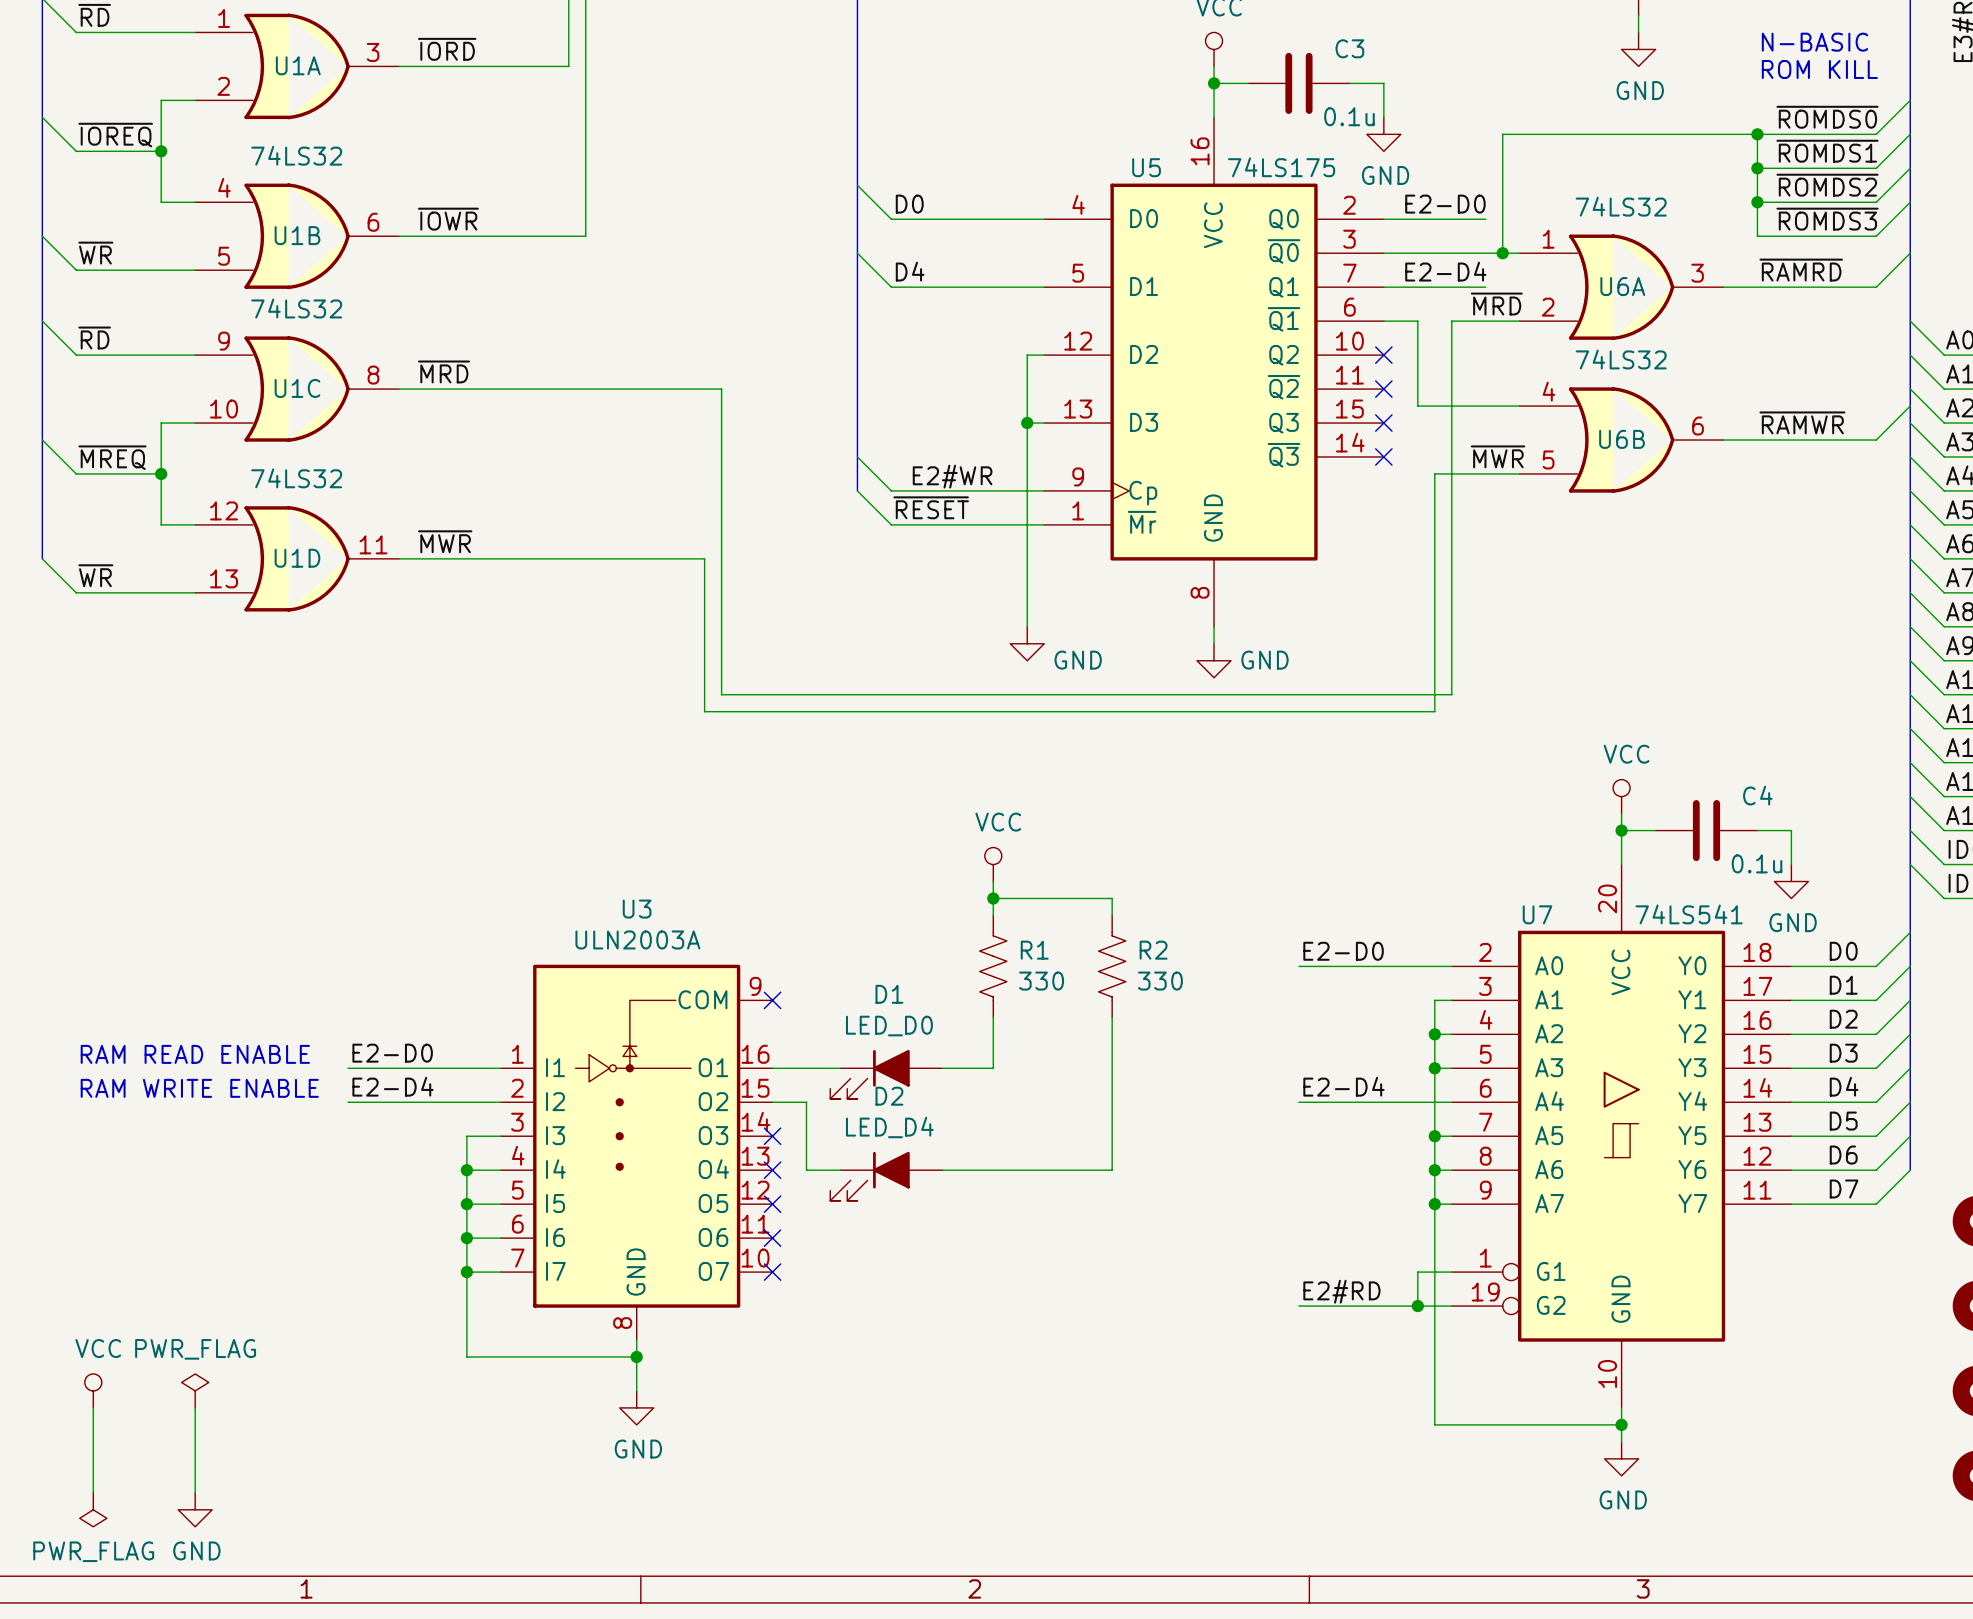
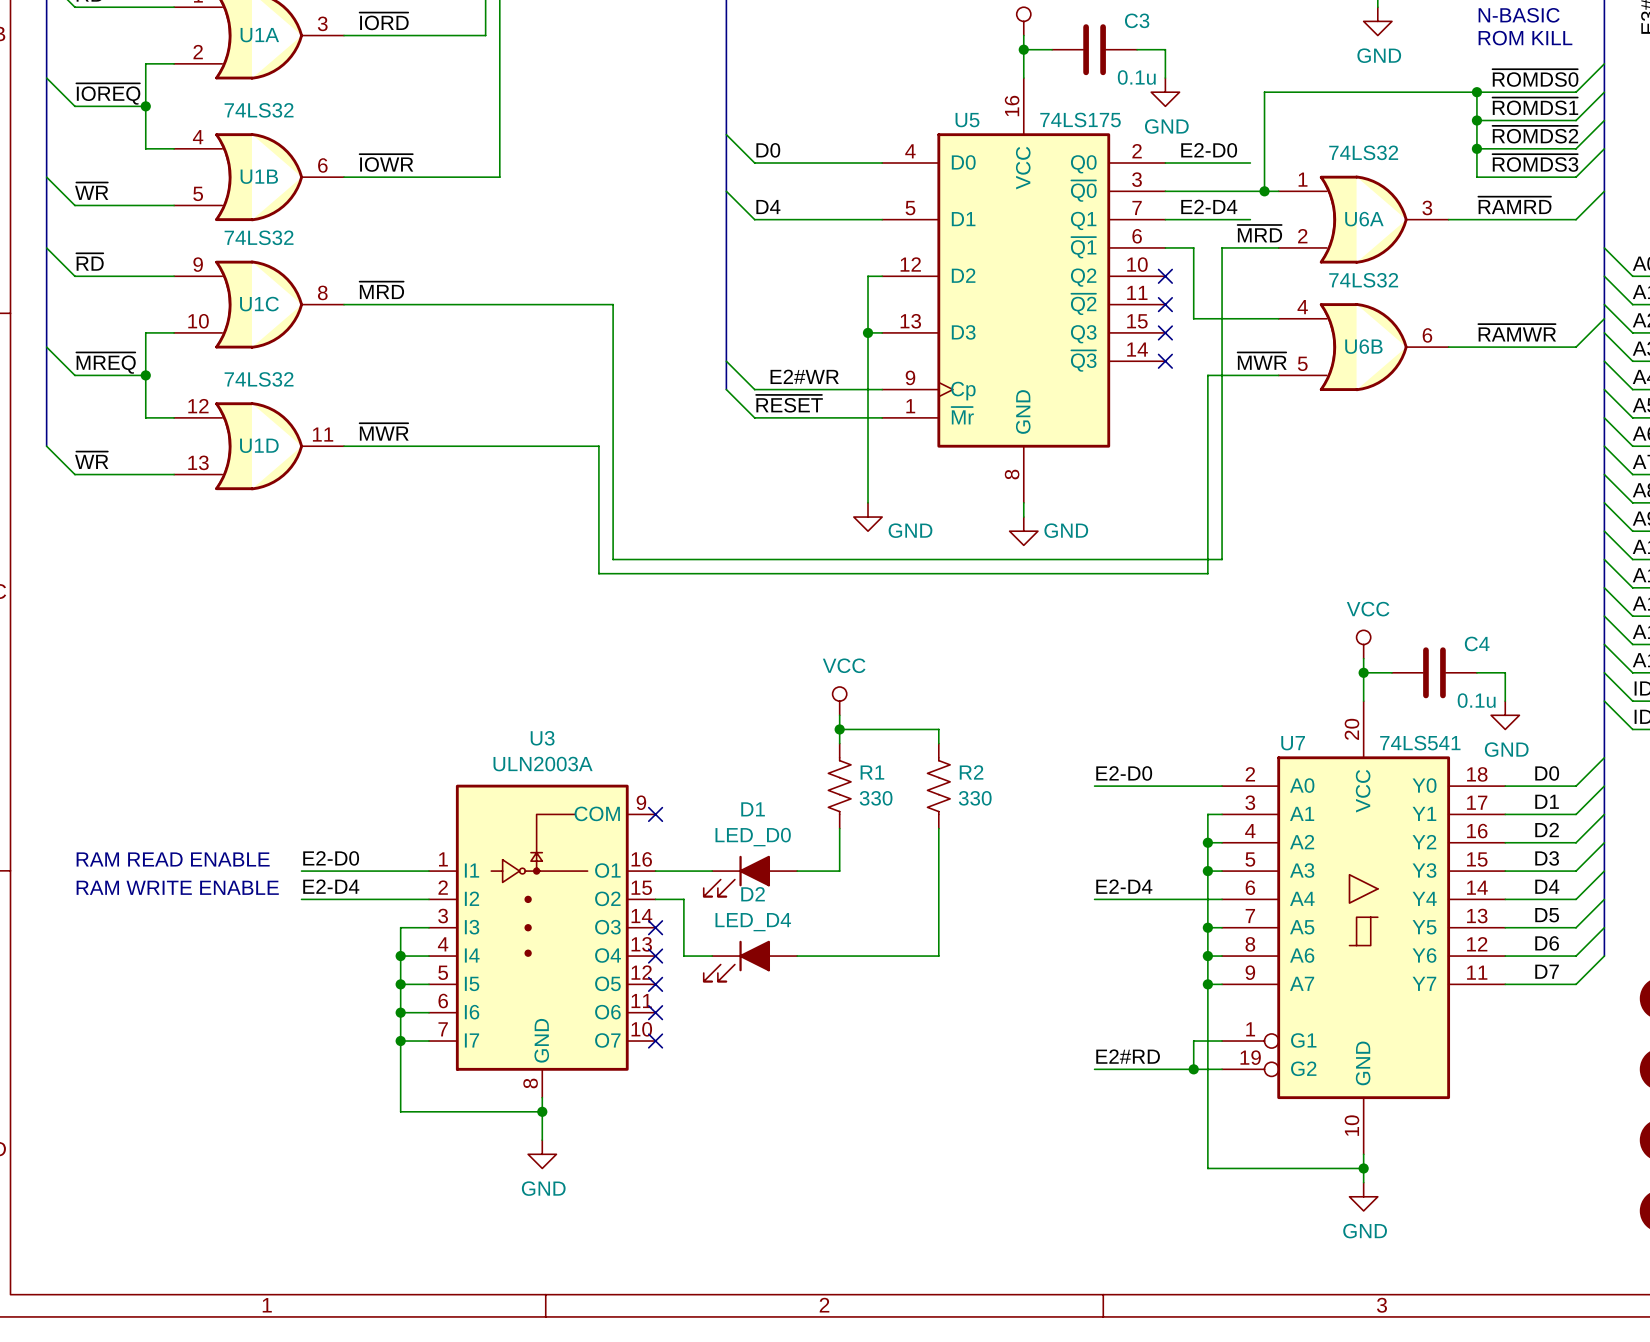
power symbol: VCC (93, 1390) -> none
power symbol: PWR_FLAG (195, 1390) -> none
wire: (93, 1407) (93, 1492) -> none
wire: (195, 1407) (195, 1492) -> none
power symbol: PWR_FLAG (93, 1509) -> none
power symbol: GND (195, 1509) -> none

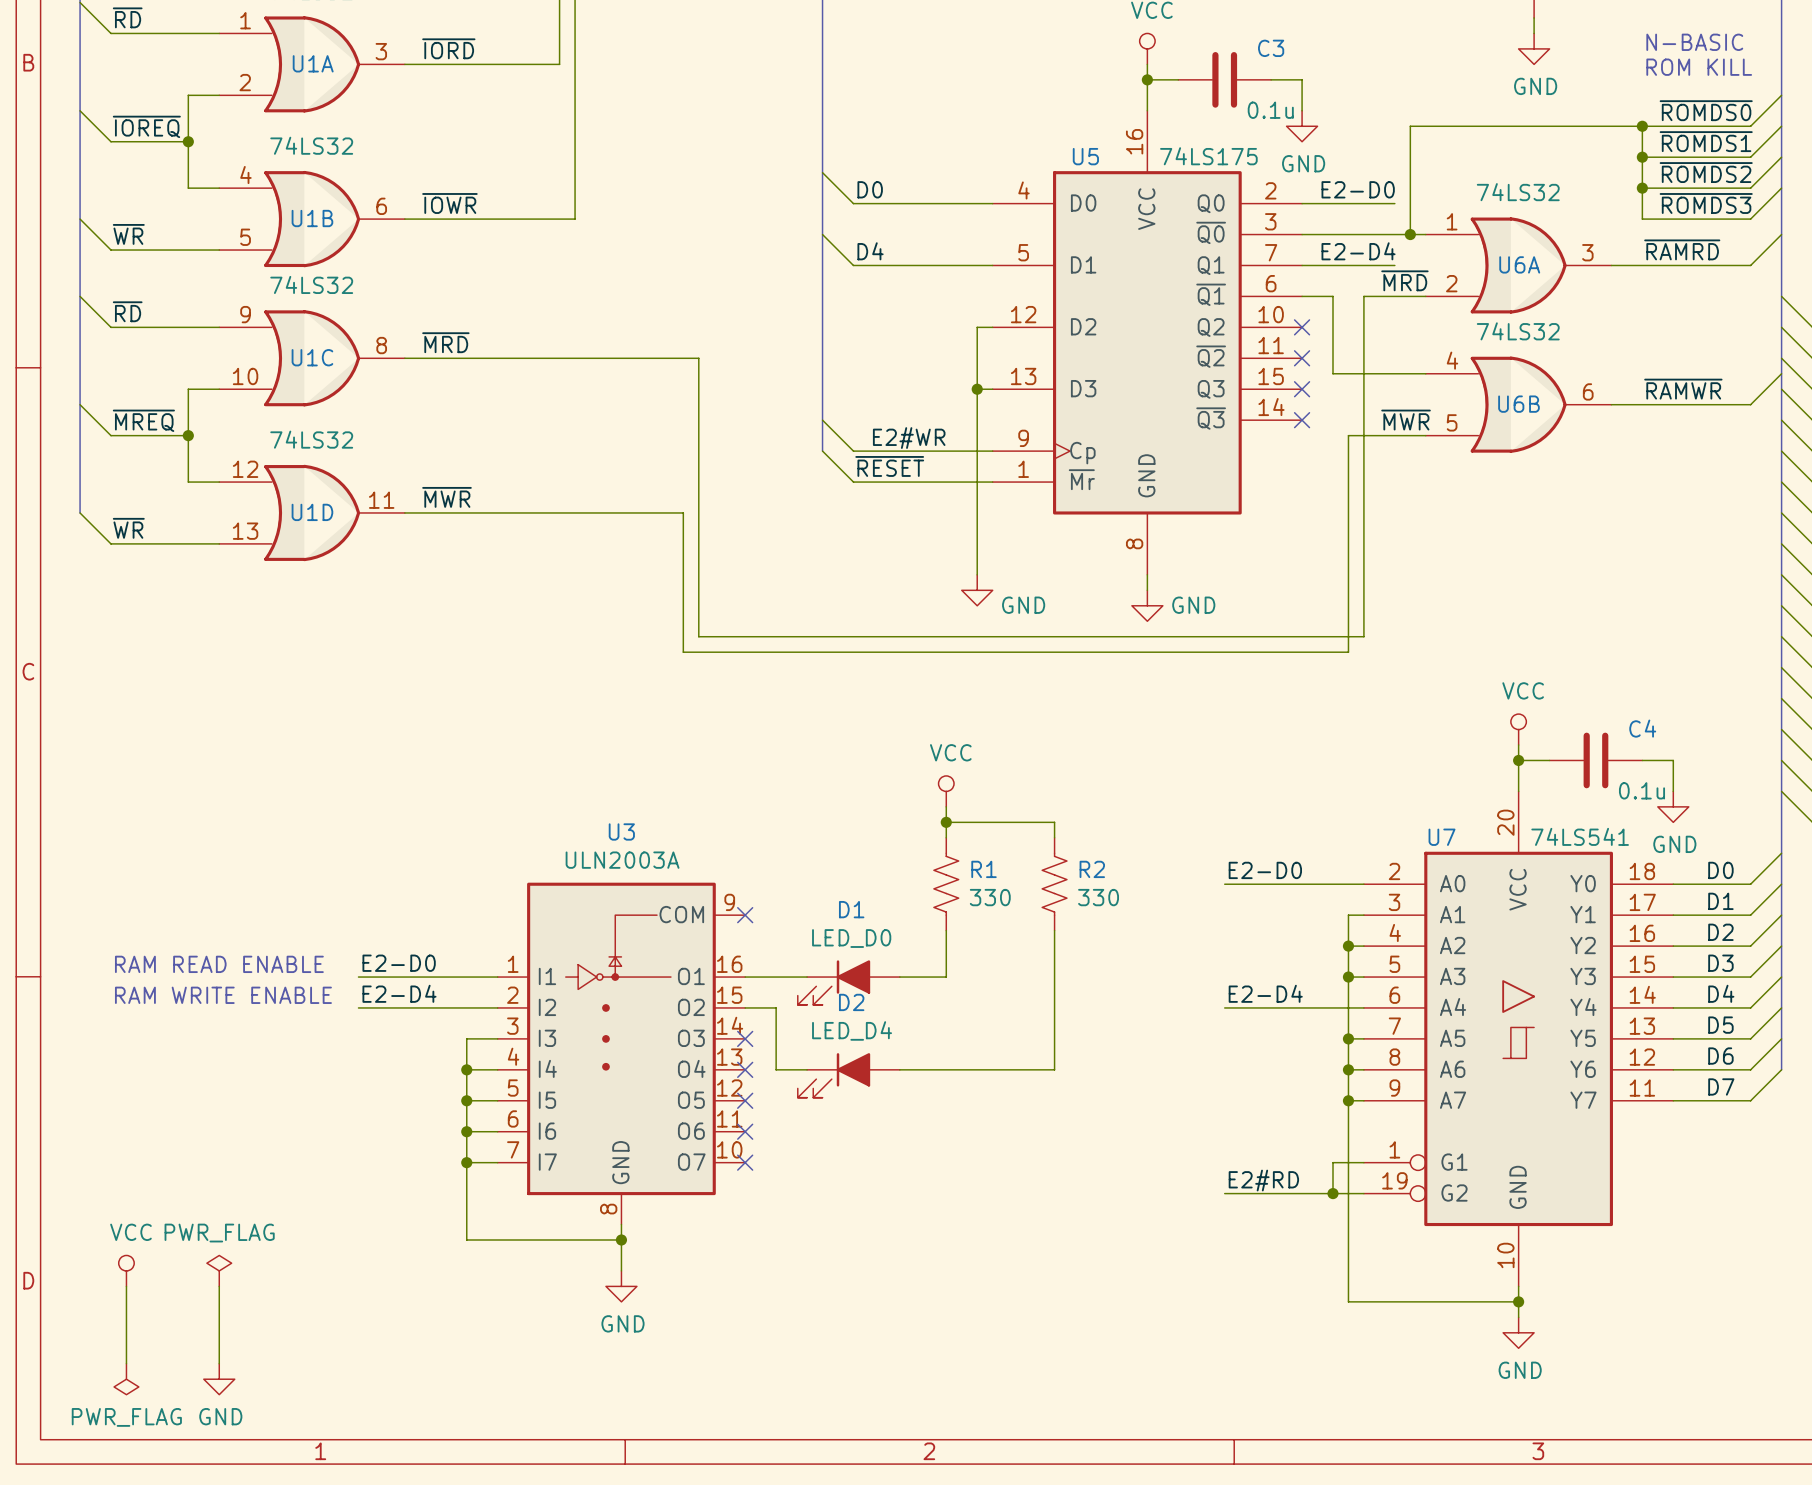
power symbol: none -> VCC (126, 1270)
power symbol: none -> PWR_FLAG (219, 1270)
wire: none -> (126, 1286) (126, 1363)
wire: none -> (219, 1286) (219, 1363)
power symbol: none -> PWR_FLAG (126, 1379)
power symbol: none -> GND (219, 1379)

